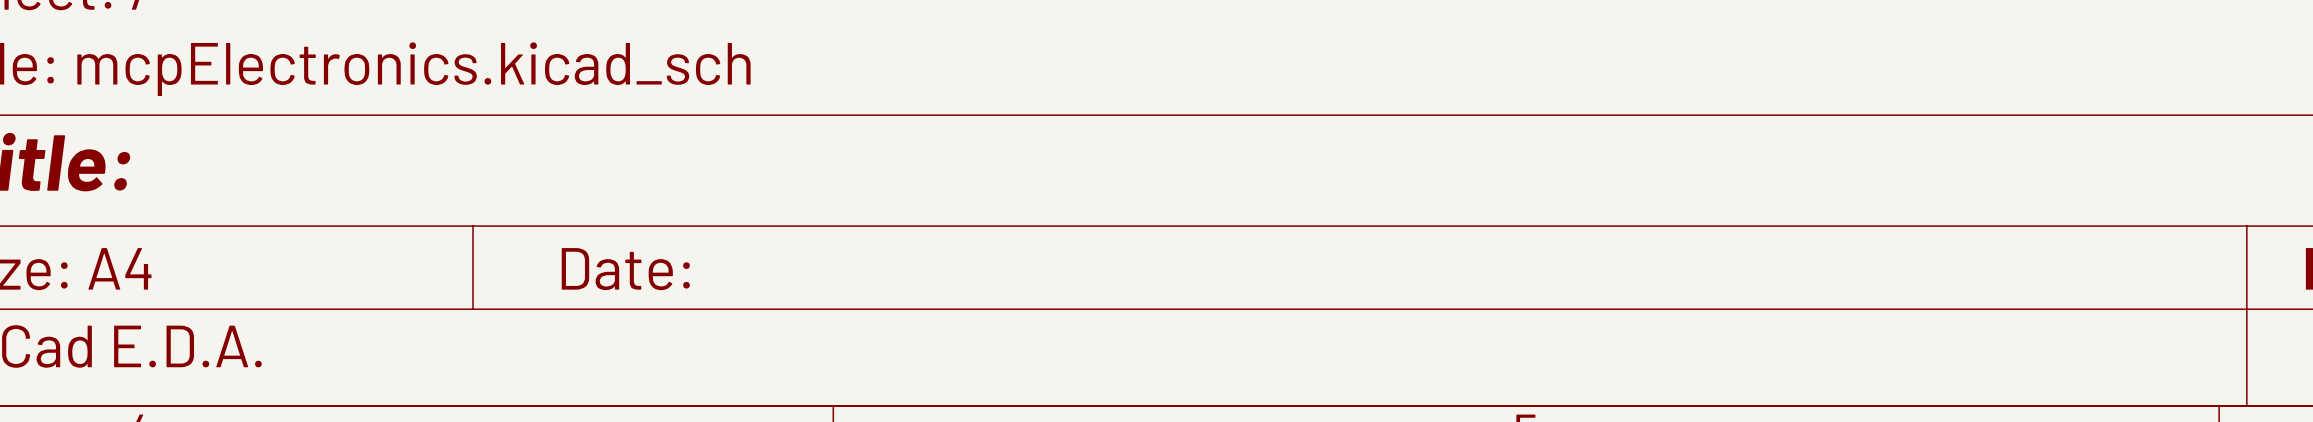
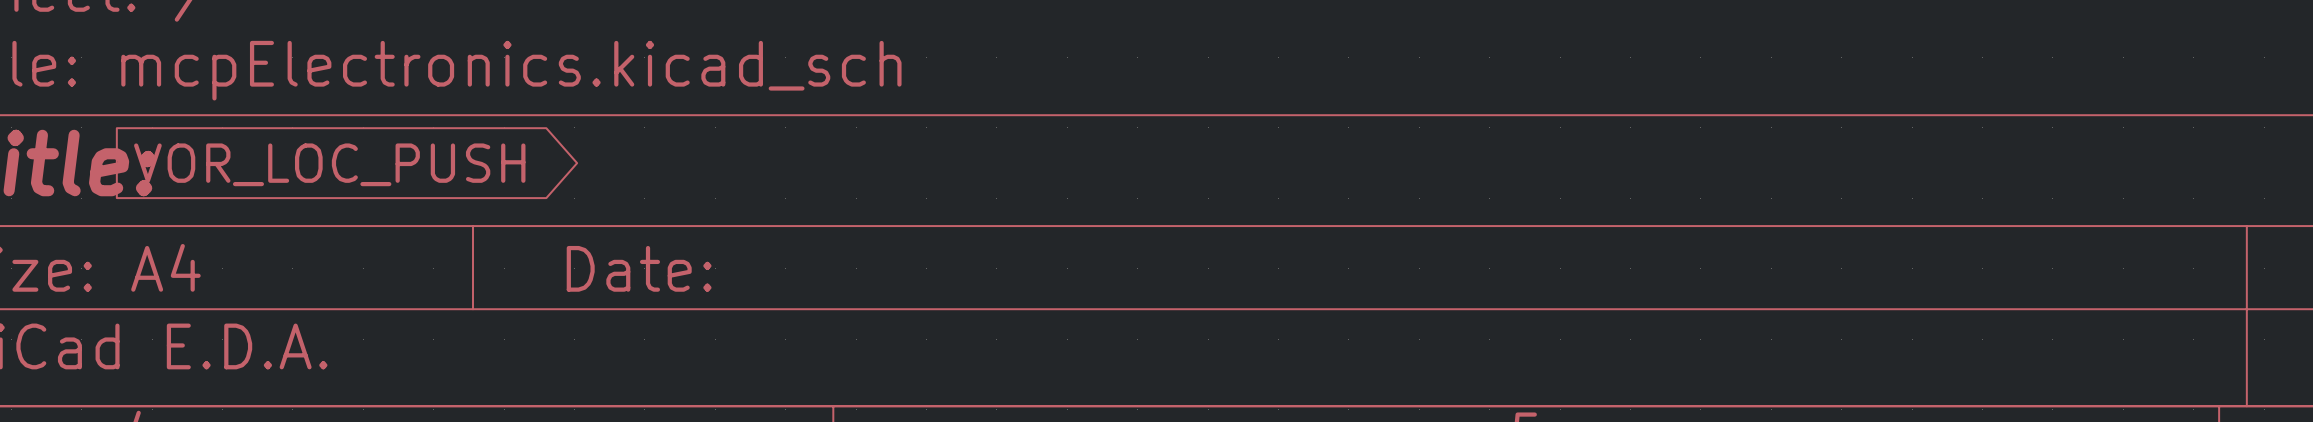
global label: none -> VOR_LOC_PUSH (329, 164)

